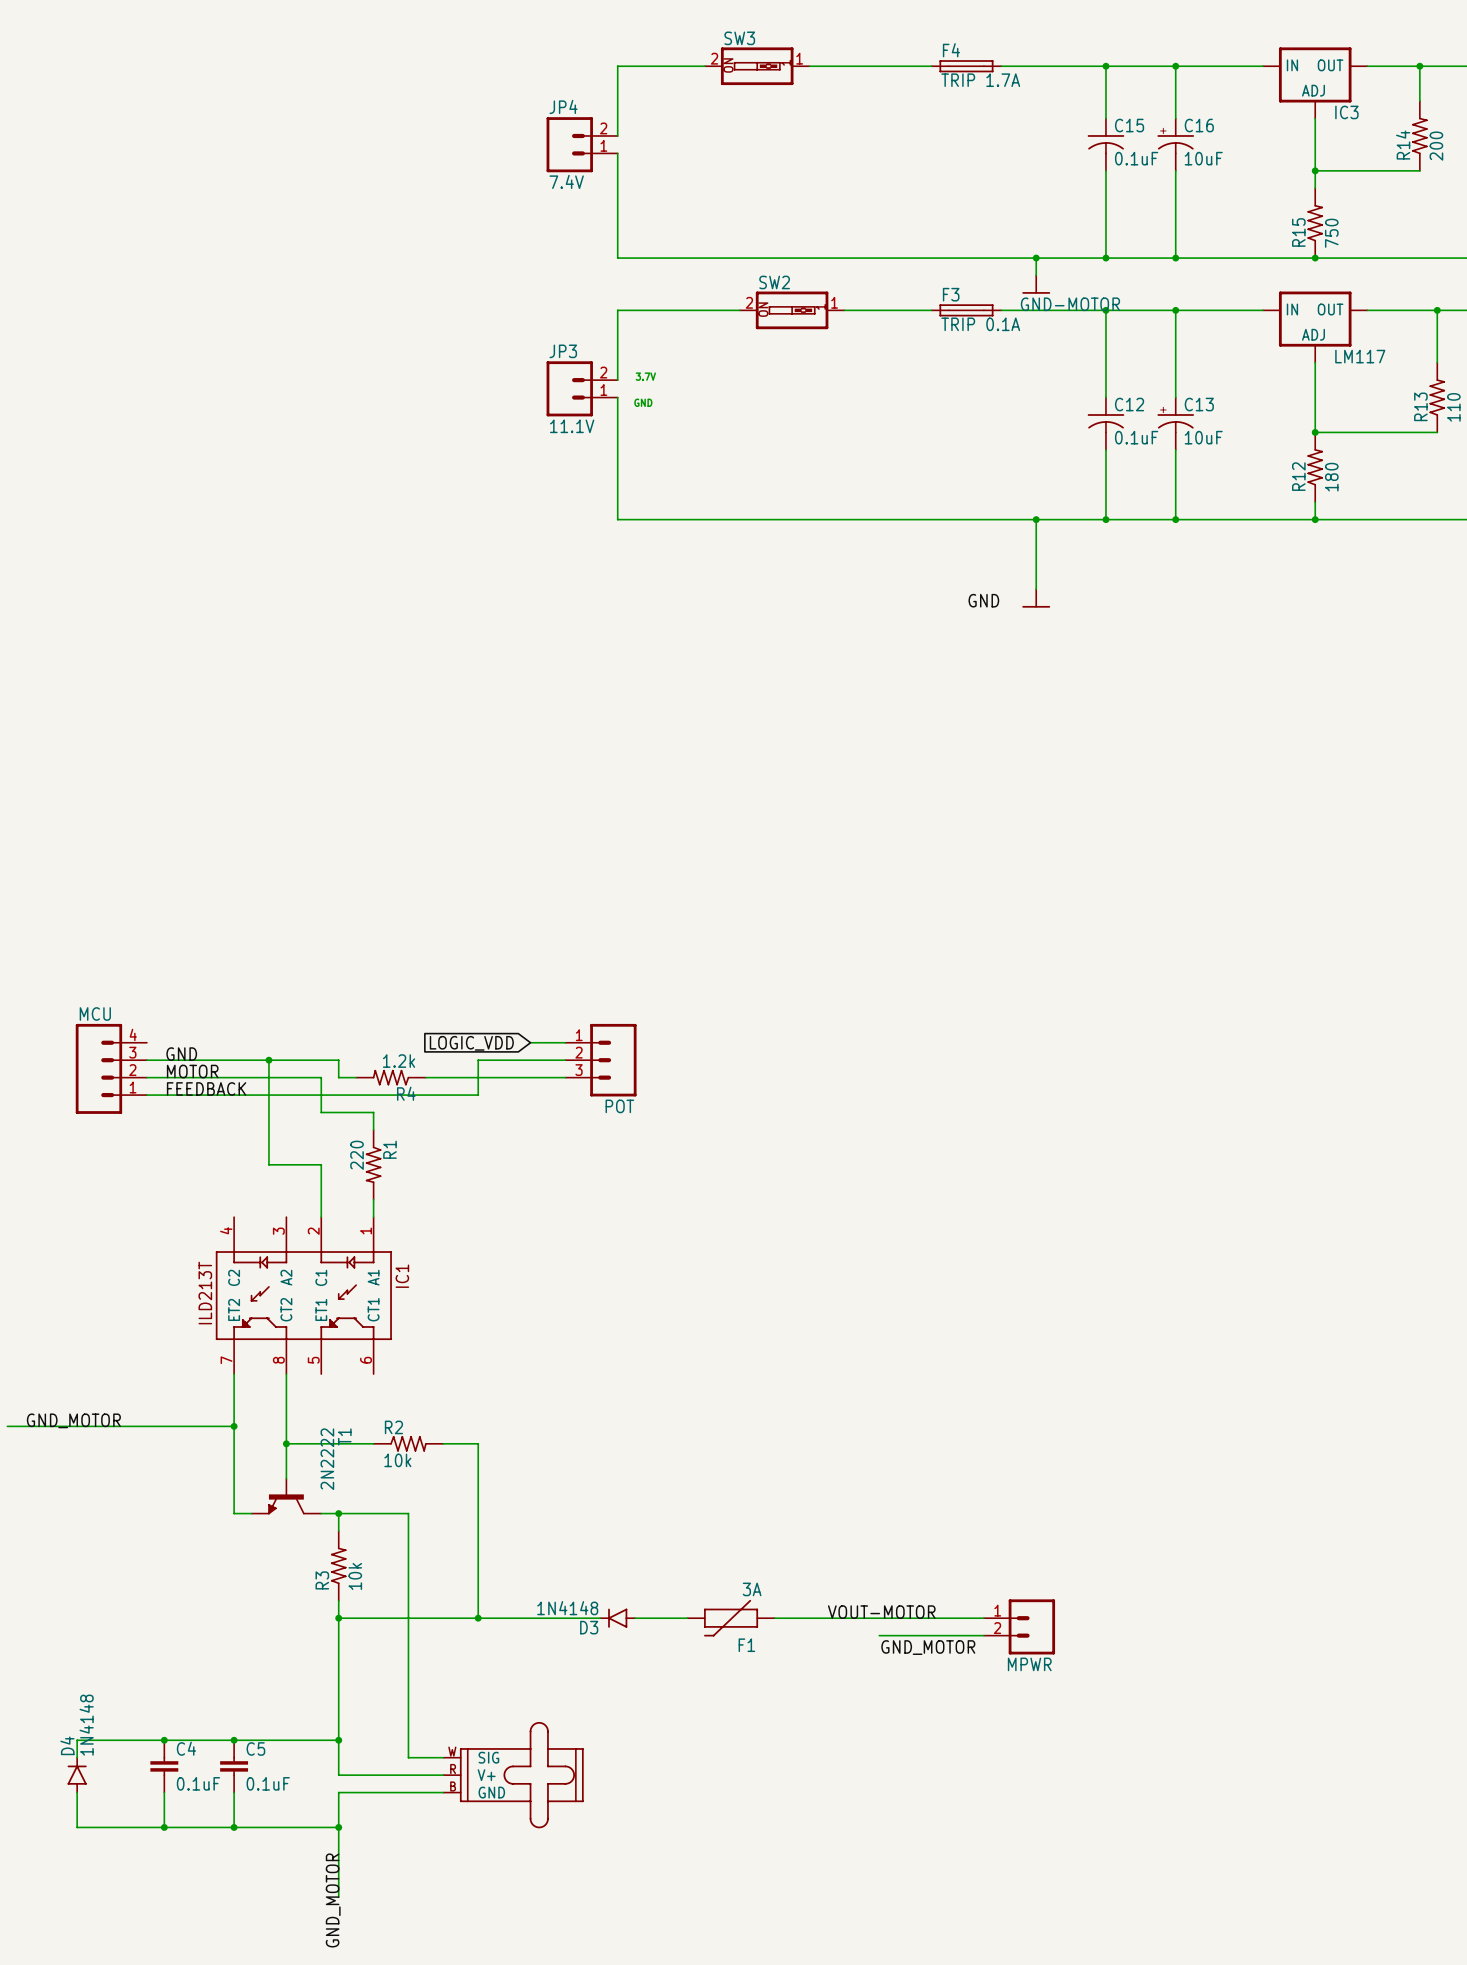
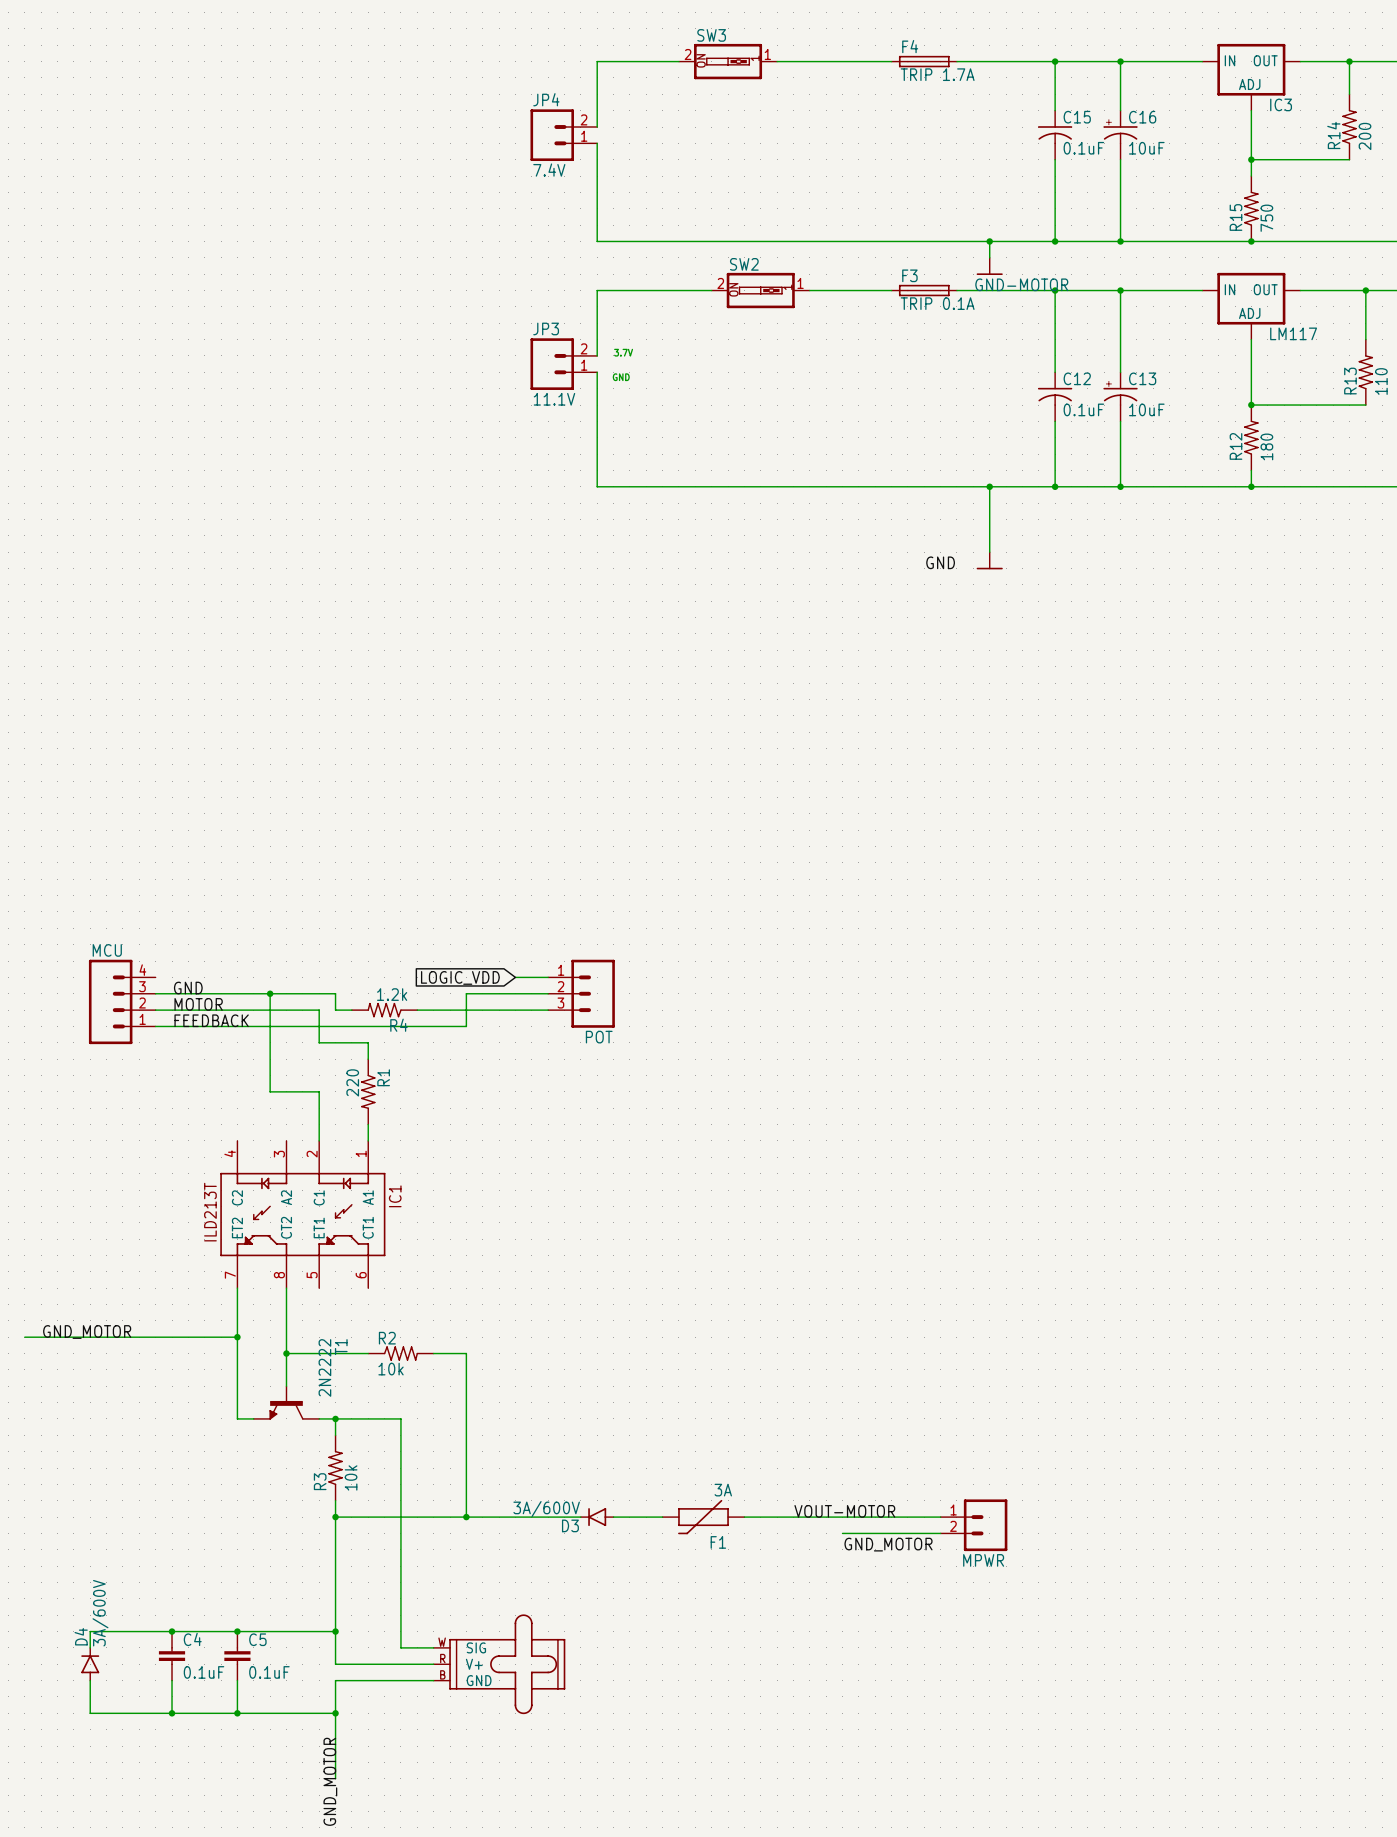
D3 value: 1N4148 (567, 1608) -> 3A/600V (546, 1509)
D4 value: 1N4148 (86, 1725) -> 3A/600V (100, 1613)

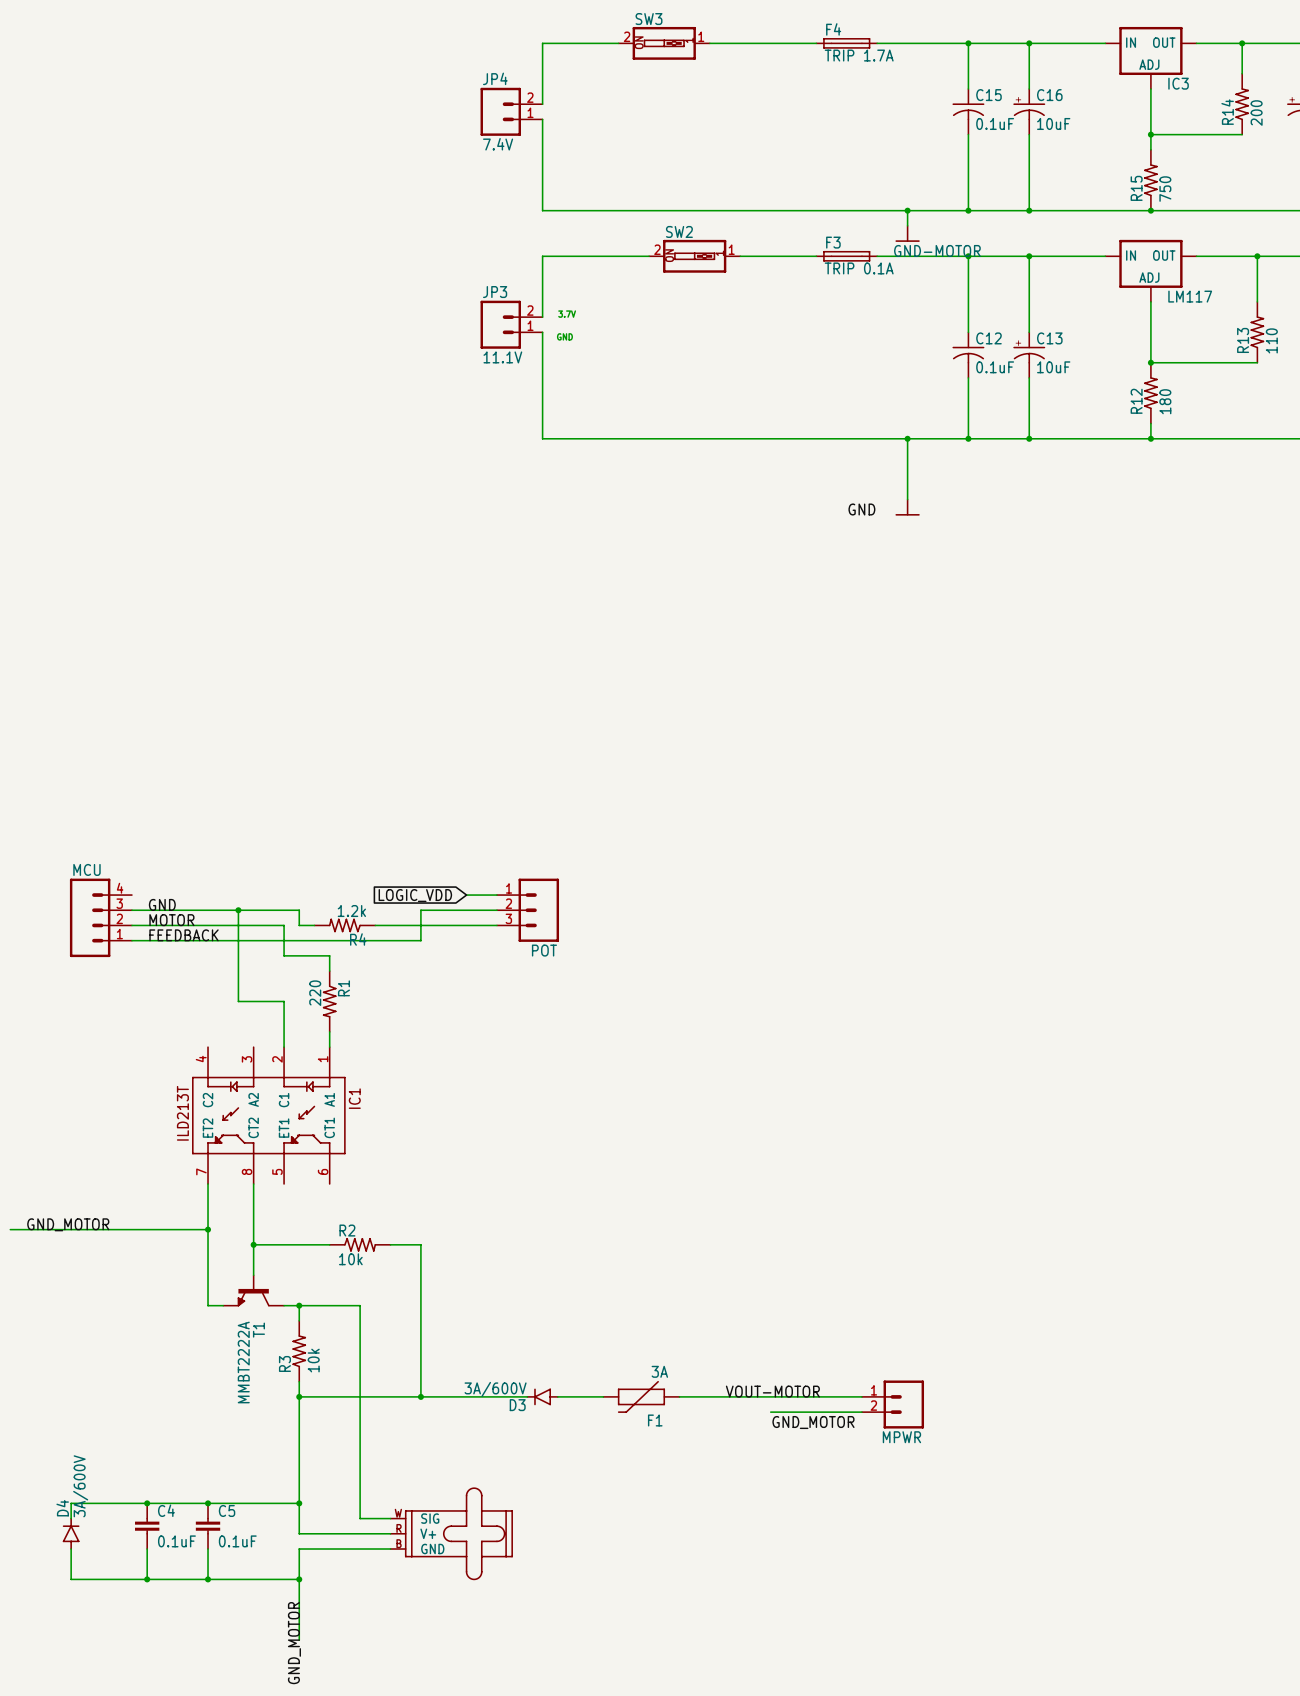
T1 name position: T1 (341, 1347) -> T1 (258, 1330)
T1 value: 2N2222 (324, 1367) -> MMBT2222A (243, 1362)

